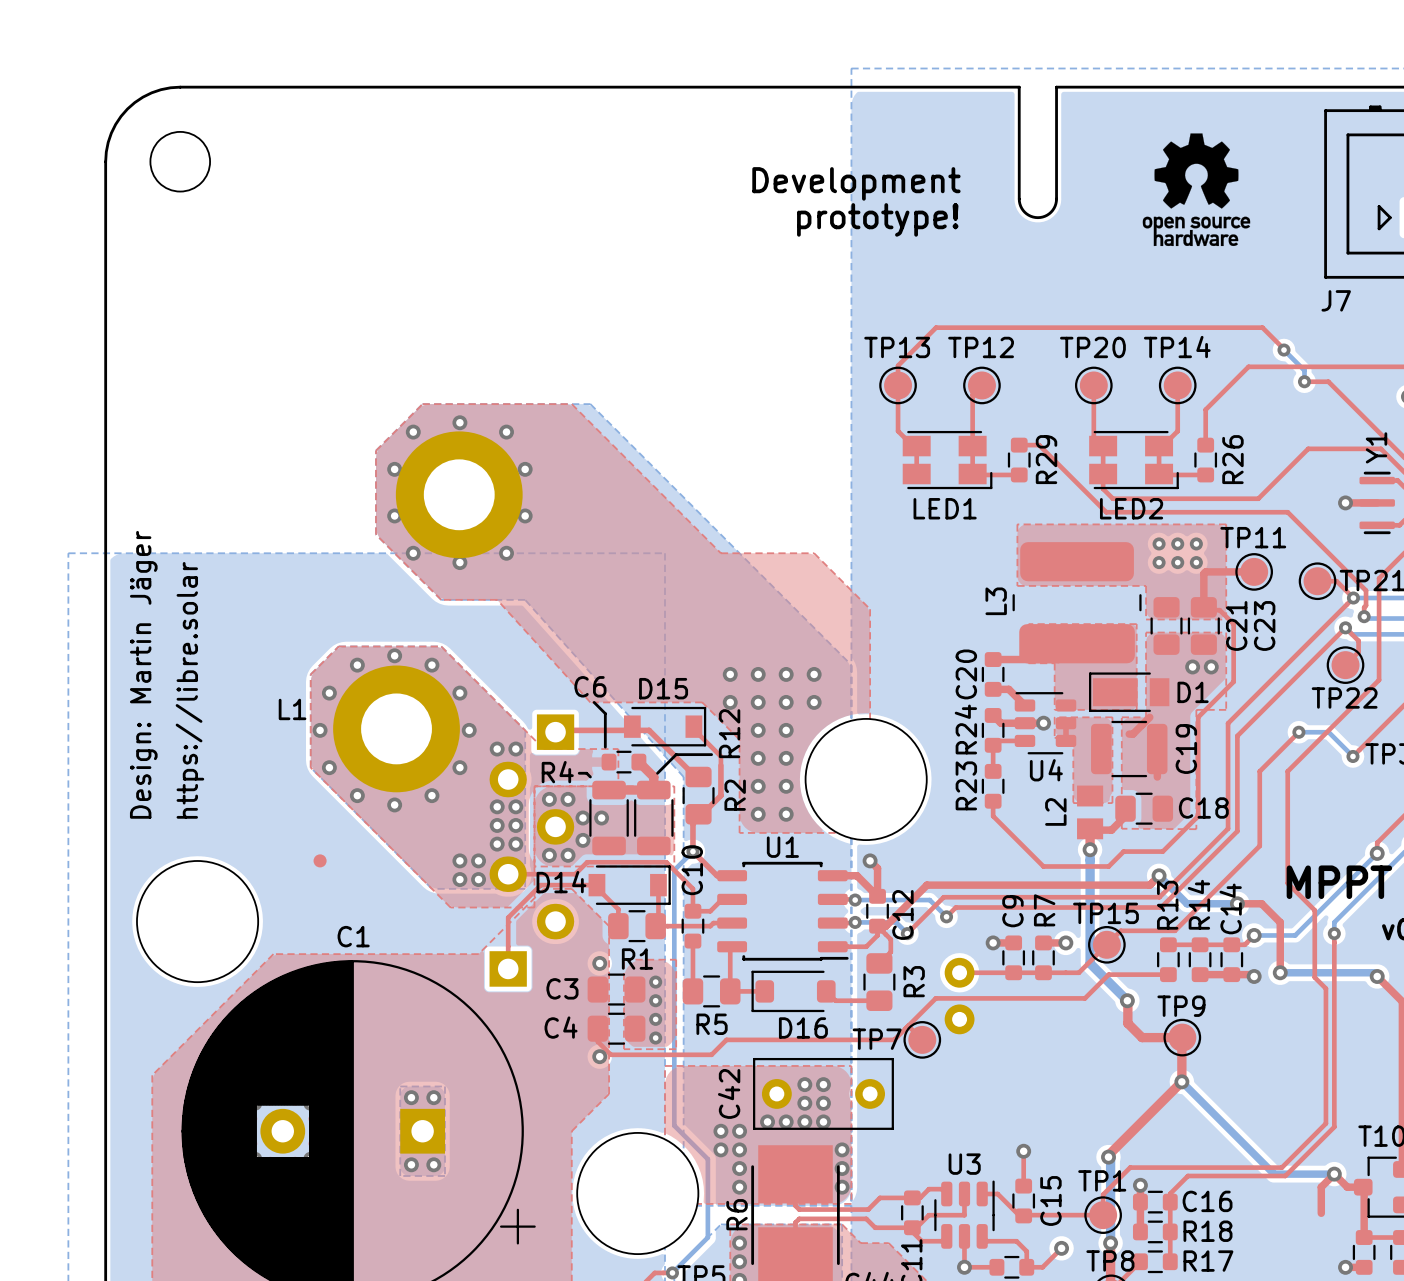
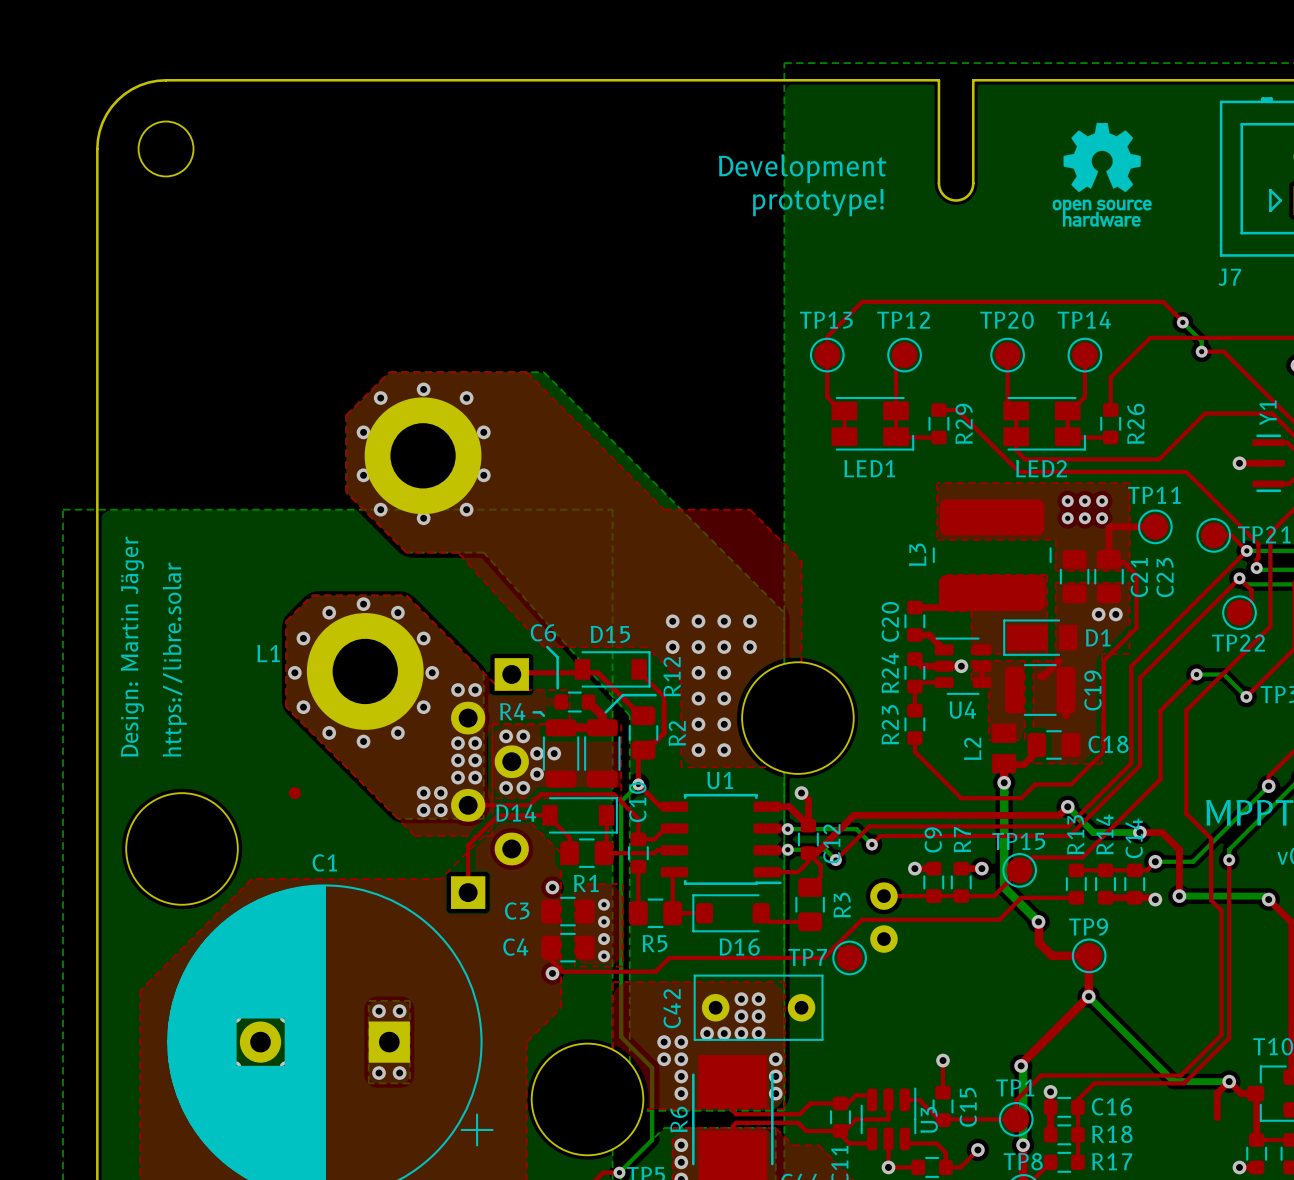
U3 name rotation: 0° (964, 1164) -> 90° counterclockwise (929, 1119)
U3 name position: U3 (964, 1164) -> U3 (929, 1119)

